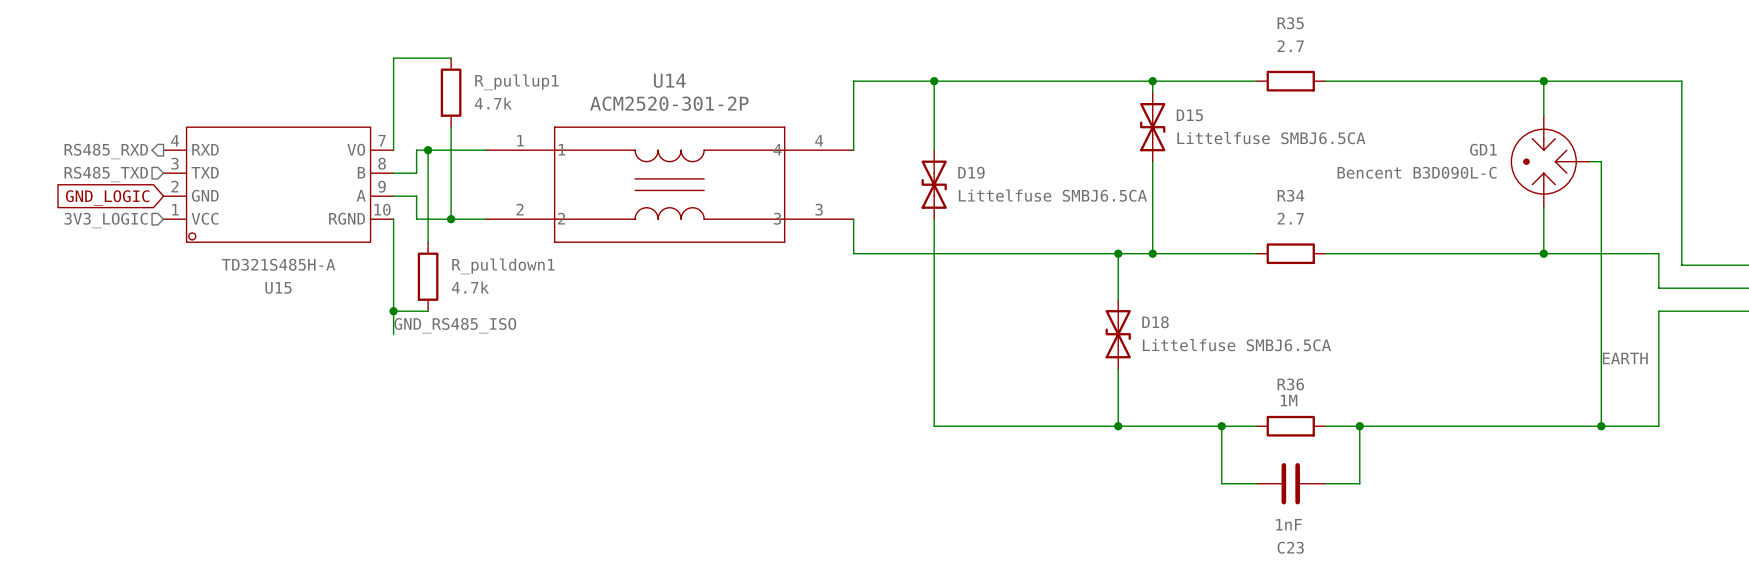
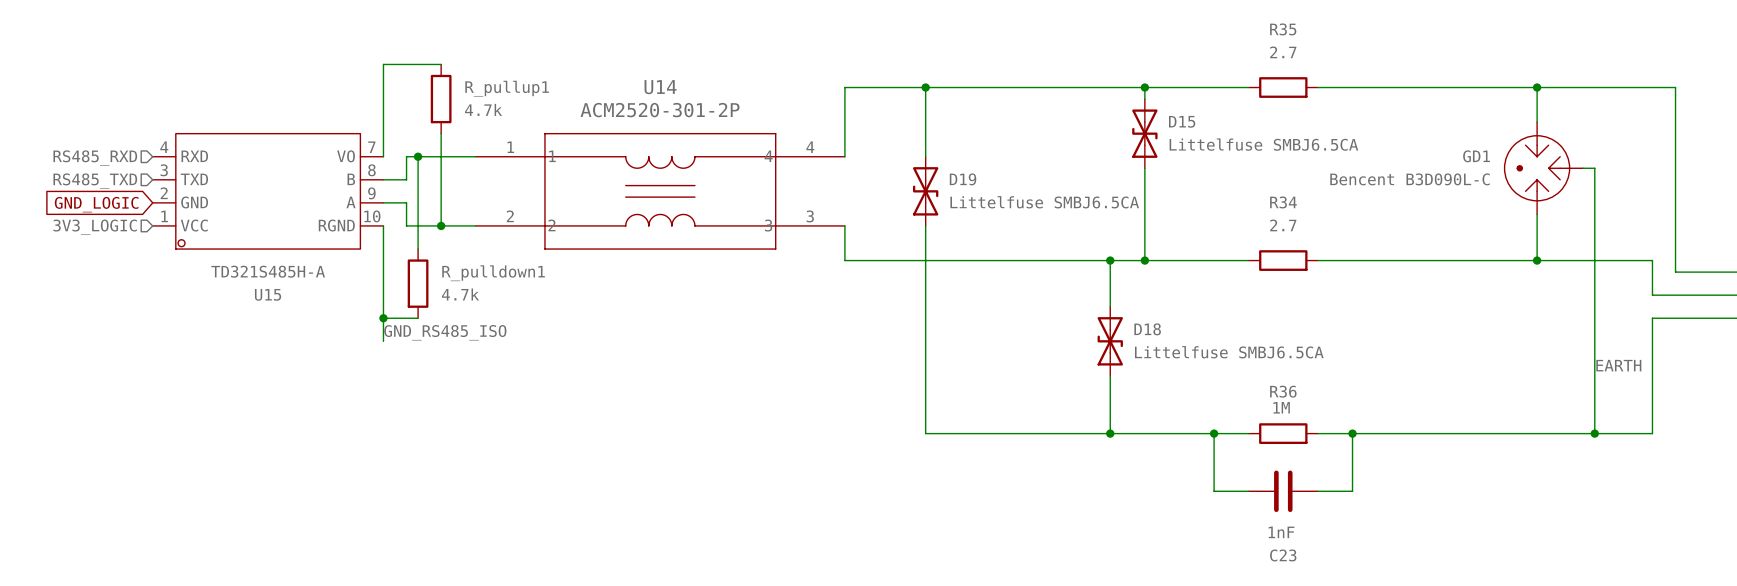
hierarchical label shape: output (106, 151) -> input (95, 158)

